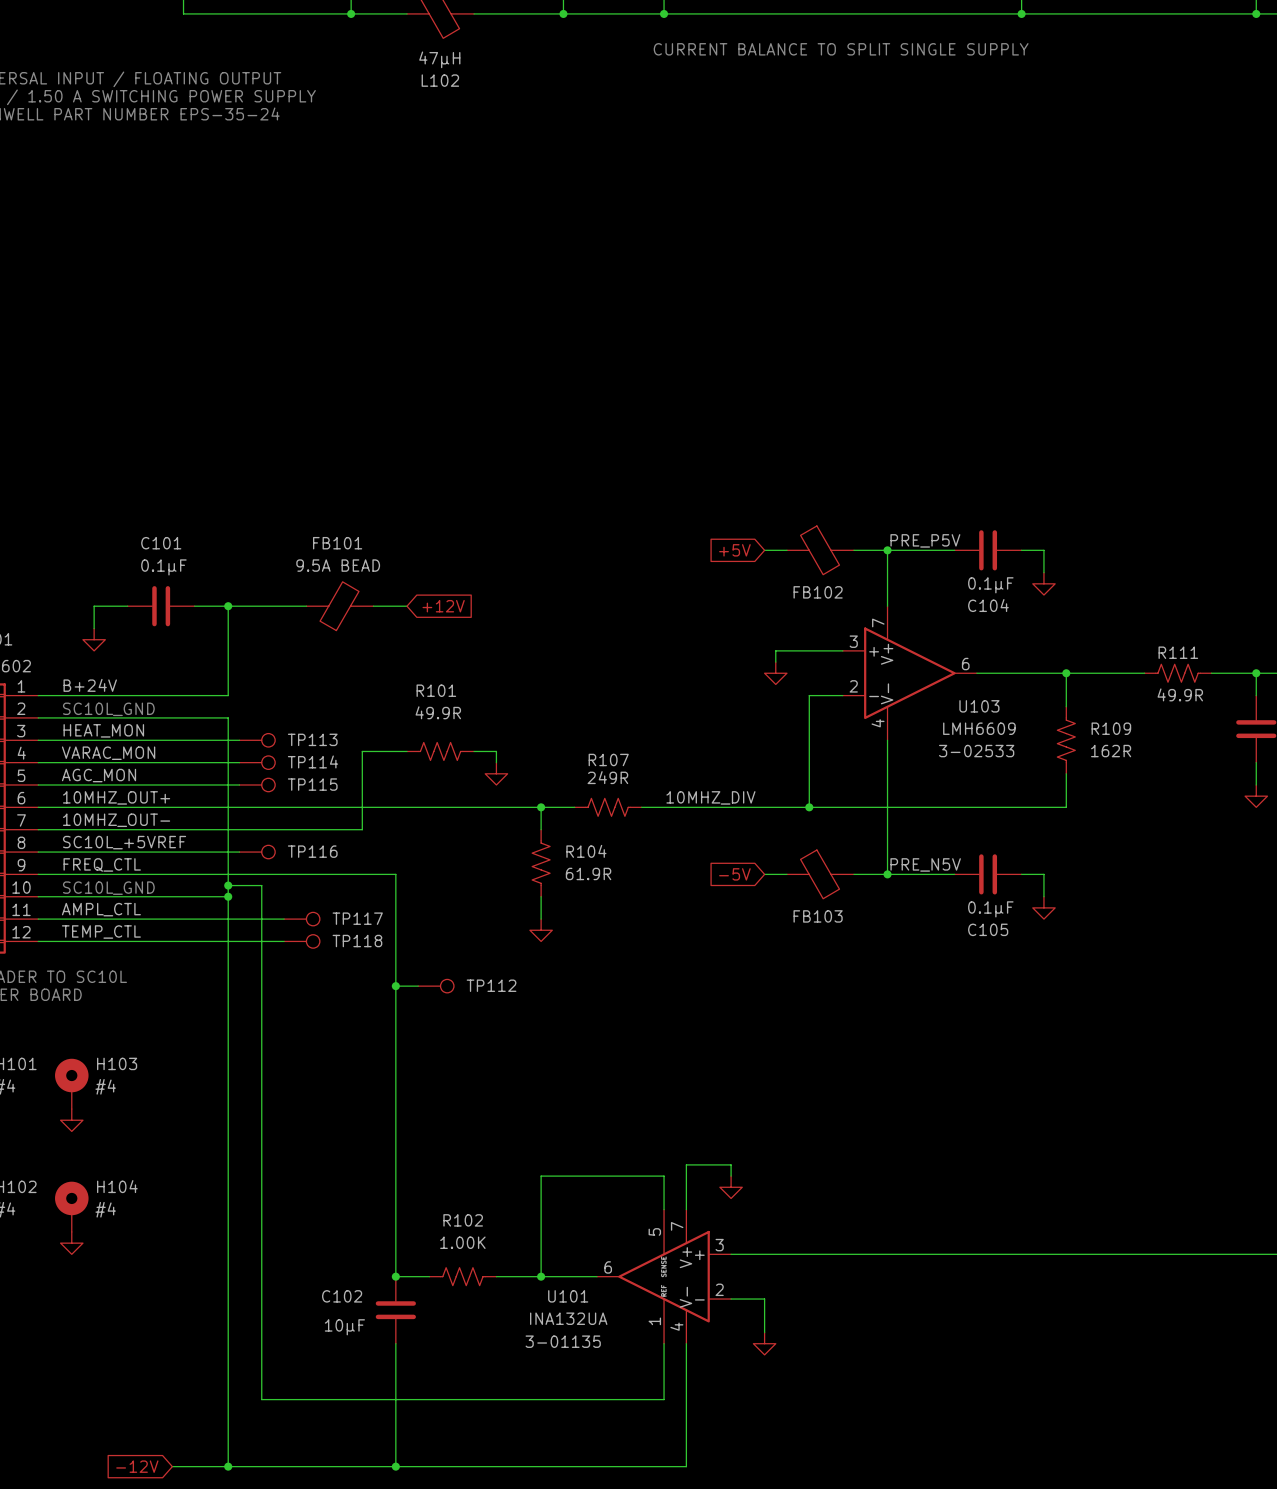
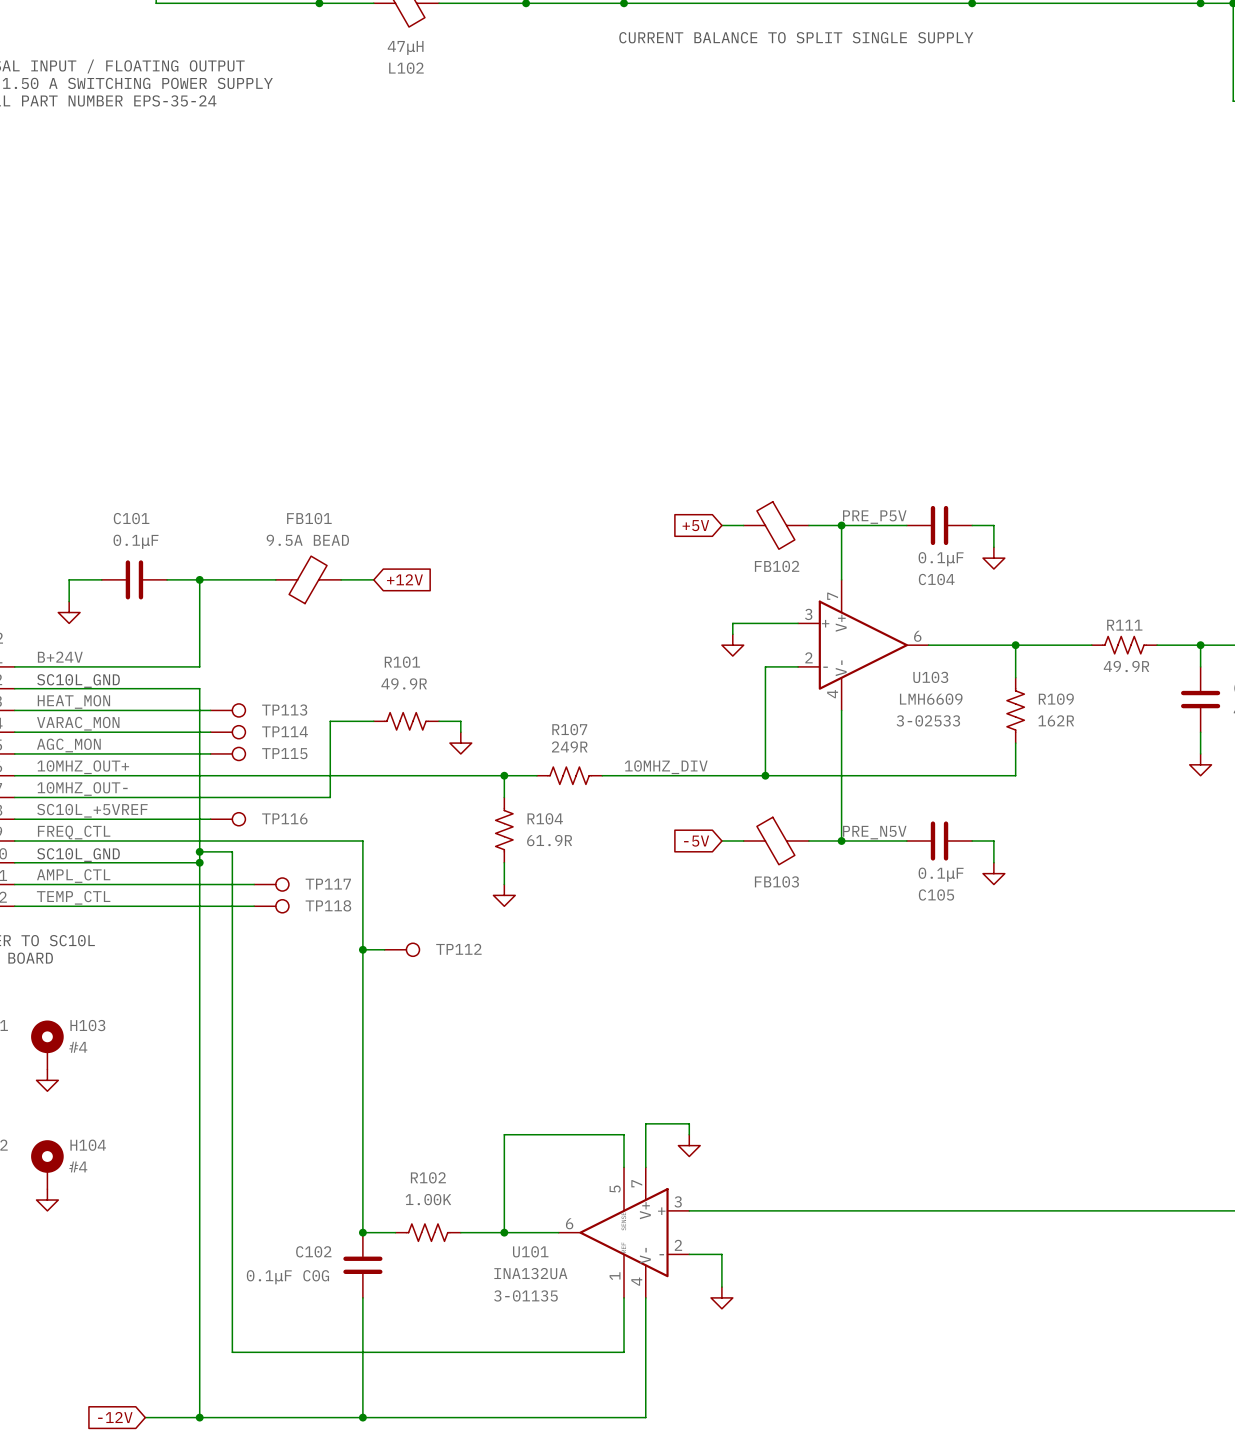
C102 value: 10μF (344, 1327) -> 0.1μF C0G (287, 1277)

